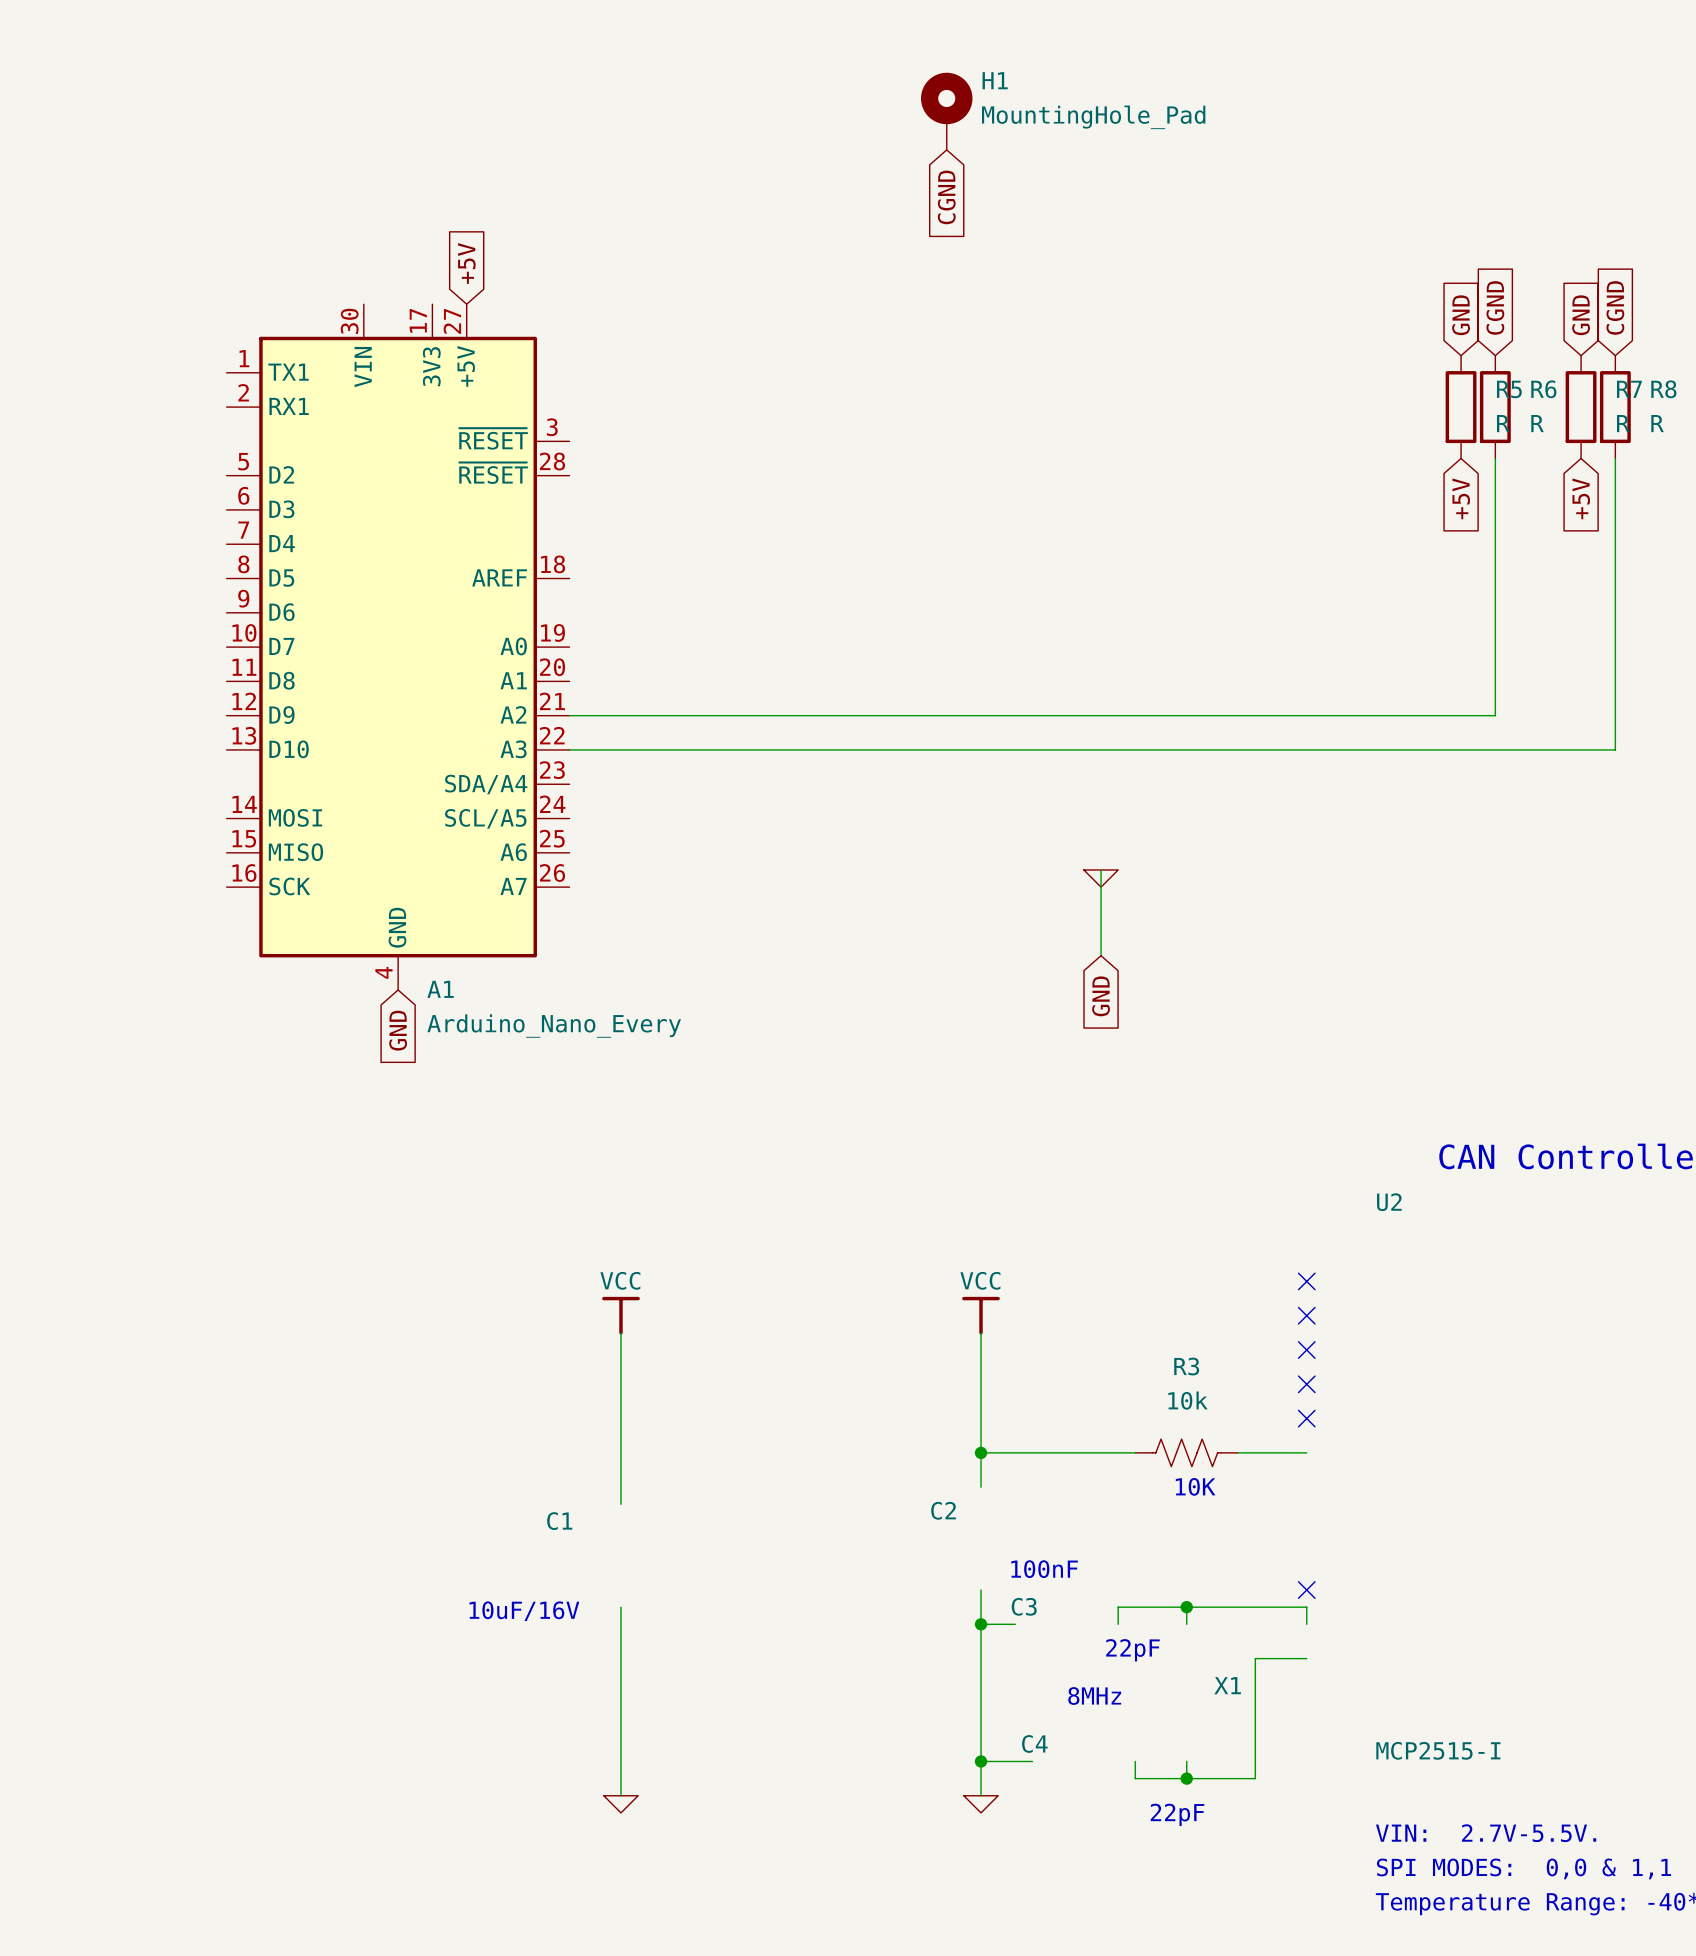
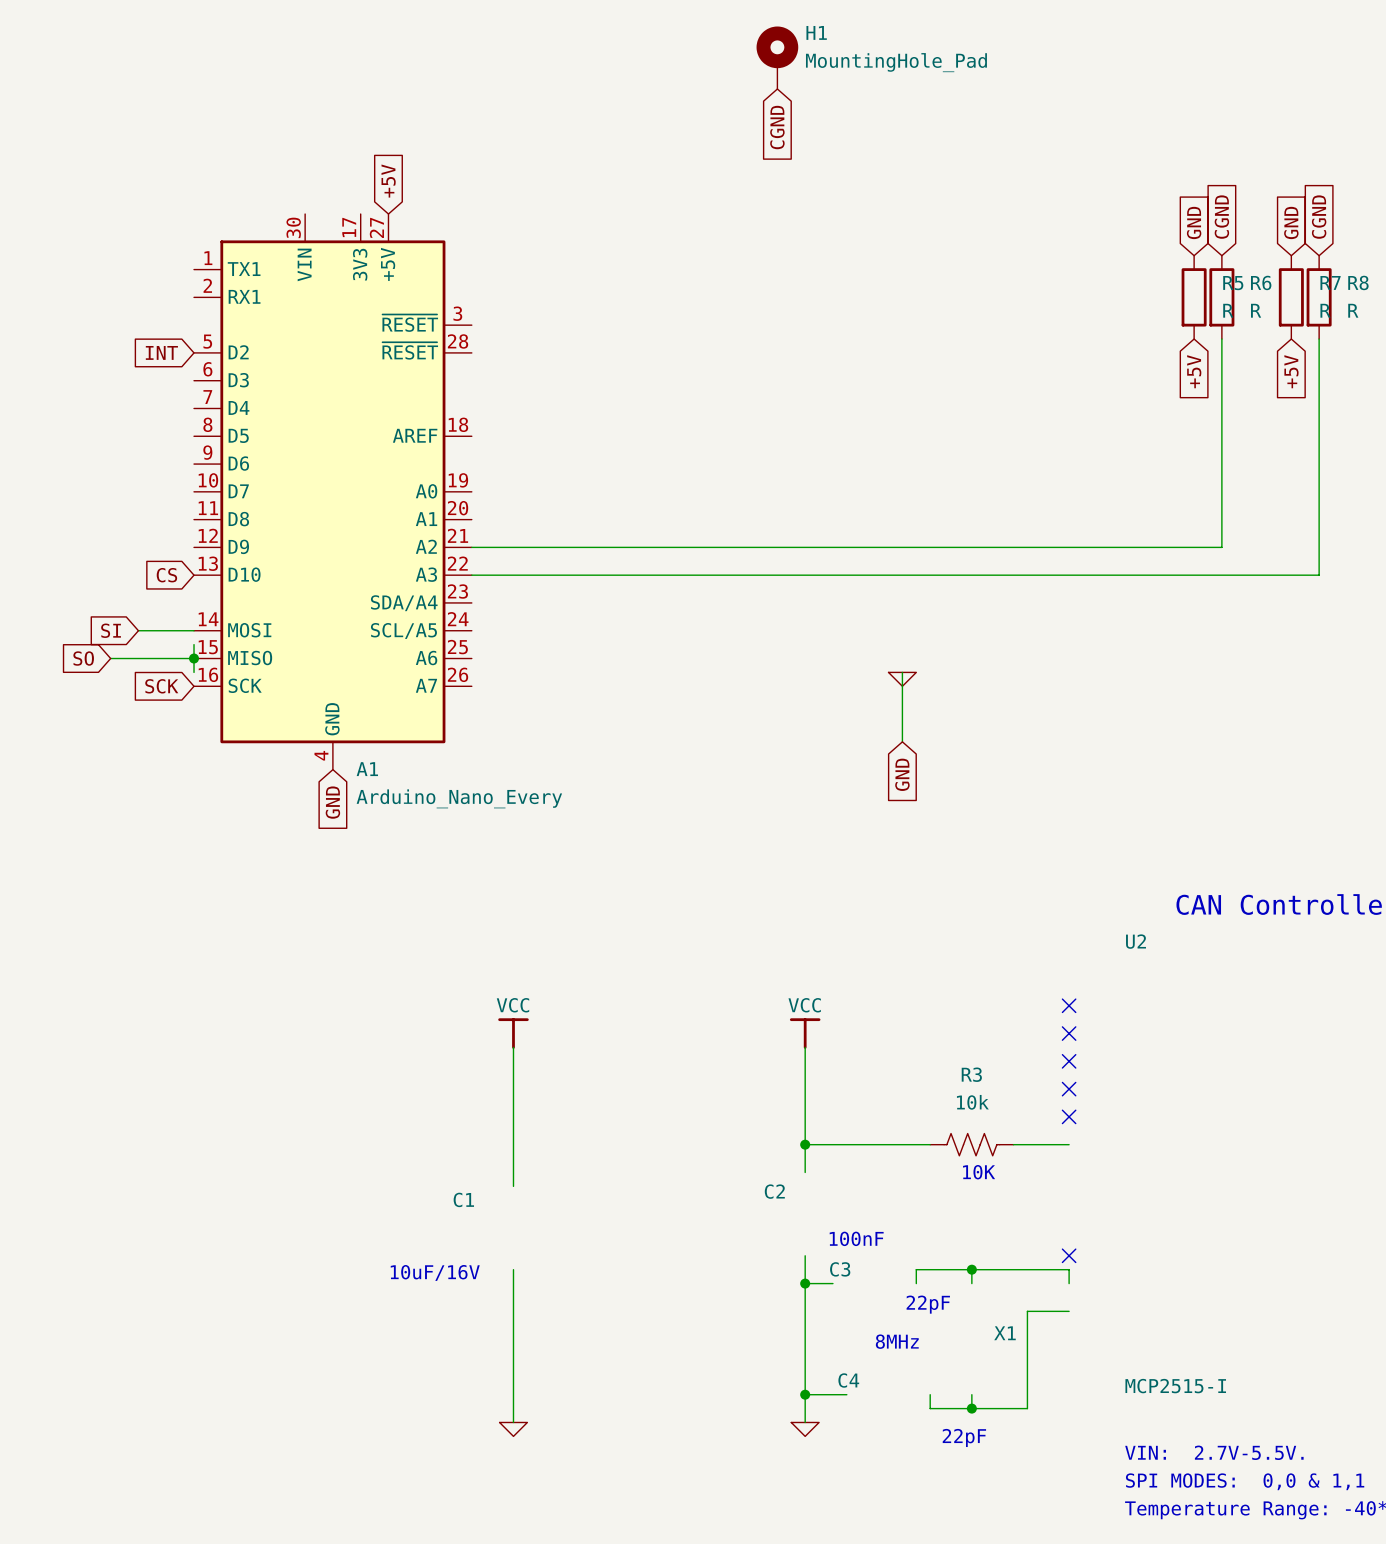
global label: none -> INT (161, 352)
global label: none -> CS (166, 575)
global label: none -> SI (111, 630)
wire: none -> (138, 630) (194, 630)
wire: none -> (194, 644) (194, 672)
global label: none -> SO (83, 658)
wire: none -> (110, 658) (194, 658)
junction: none -> (194, 658)
global label: none -> SCK (161, 686)

